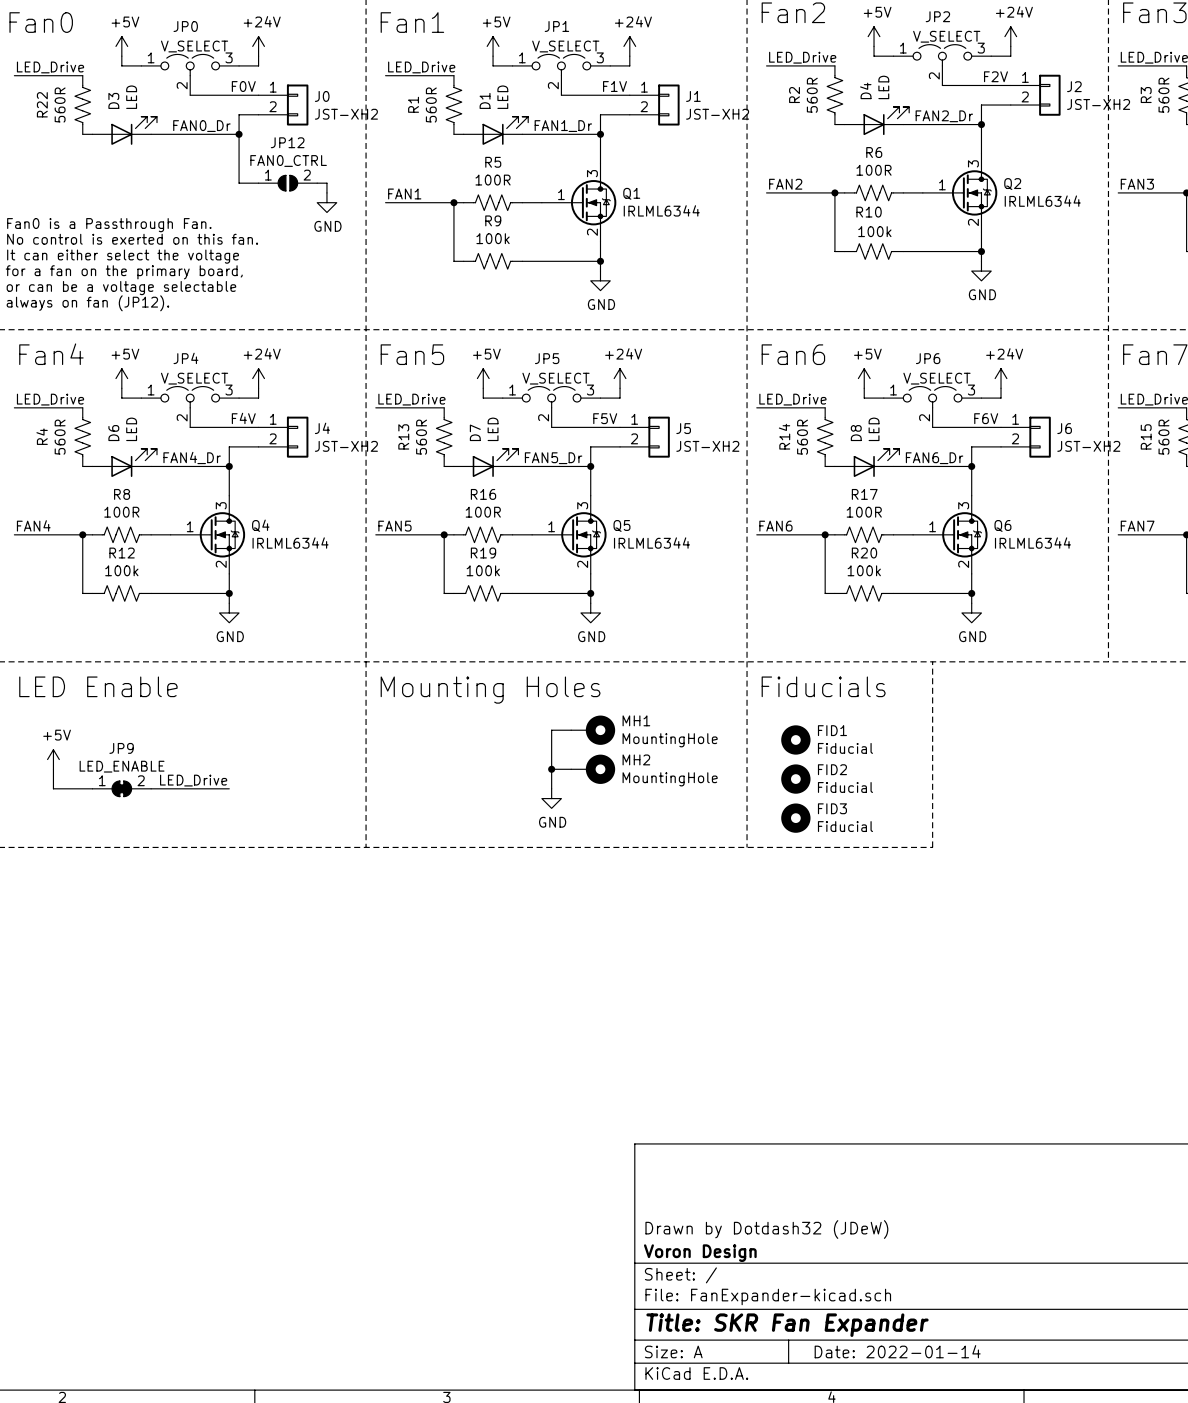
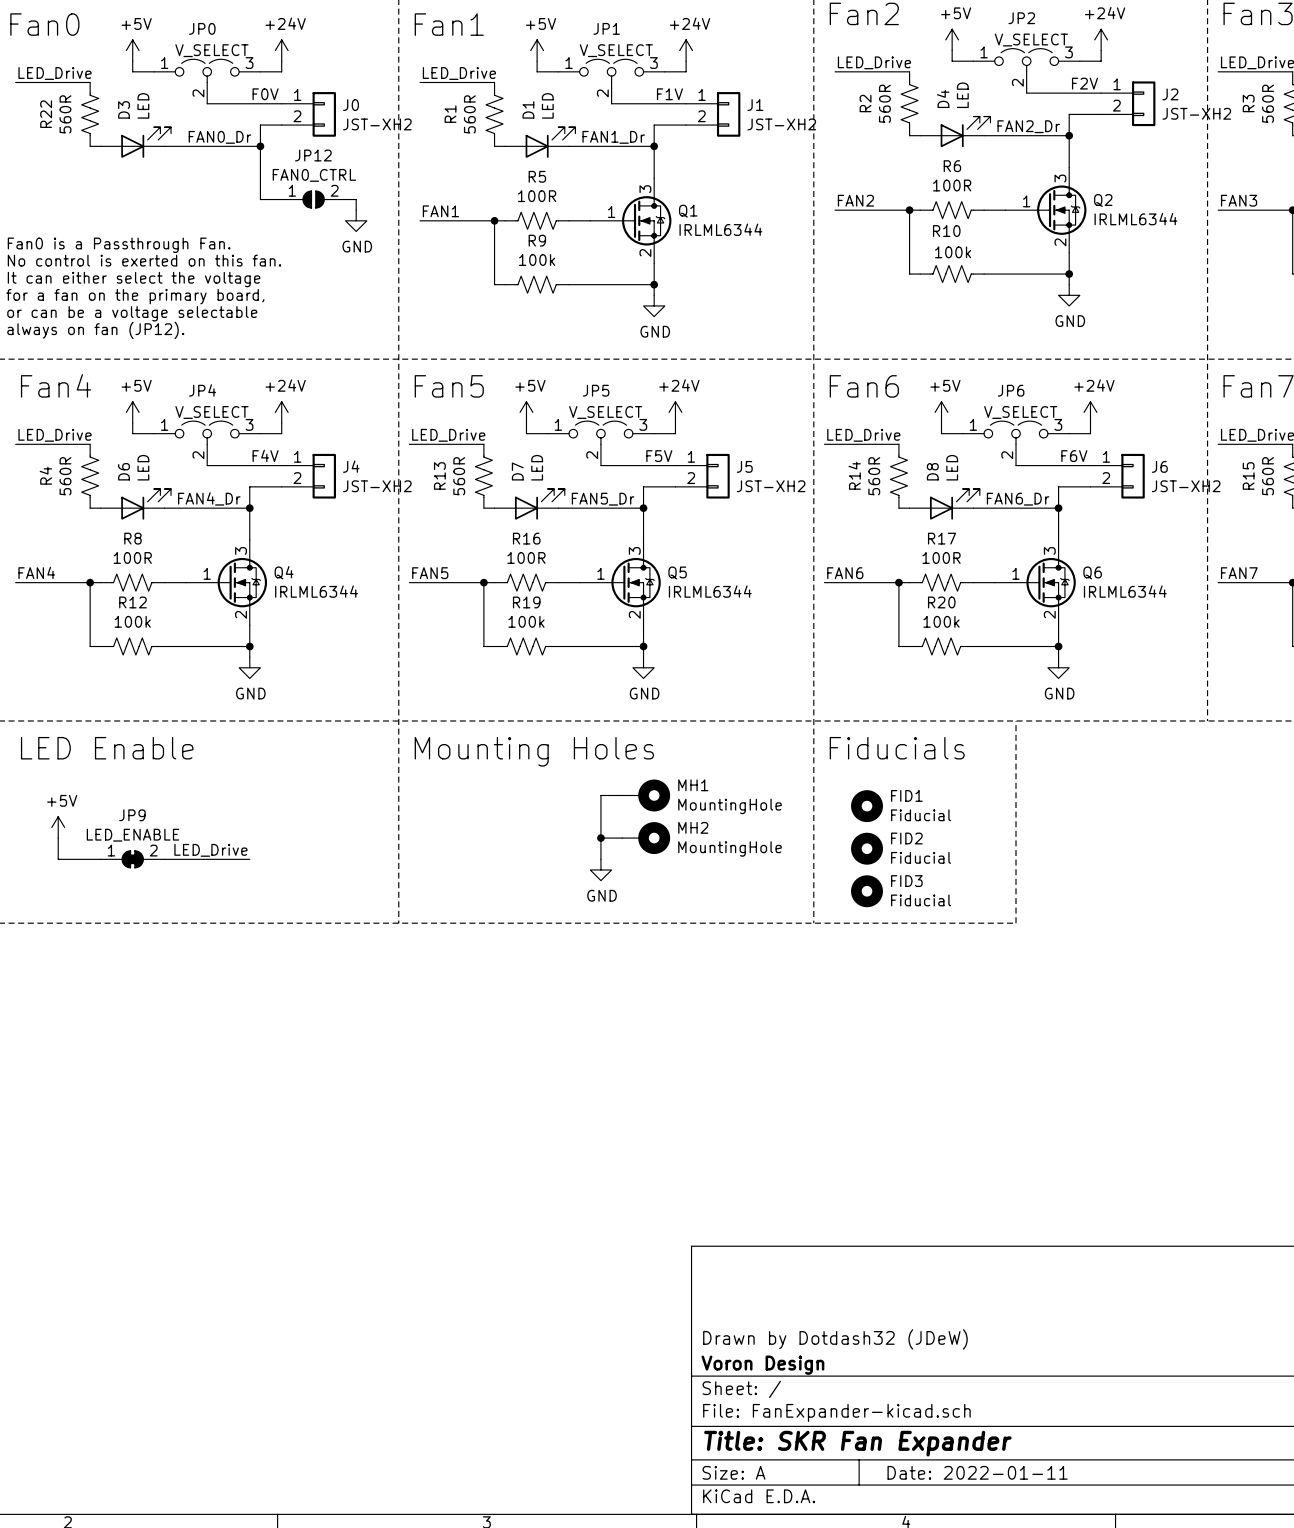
title block: Date: 2022-01-14 (897, 1351) -> Date: 2022-01-11 (977, 1472)

